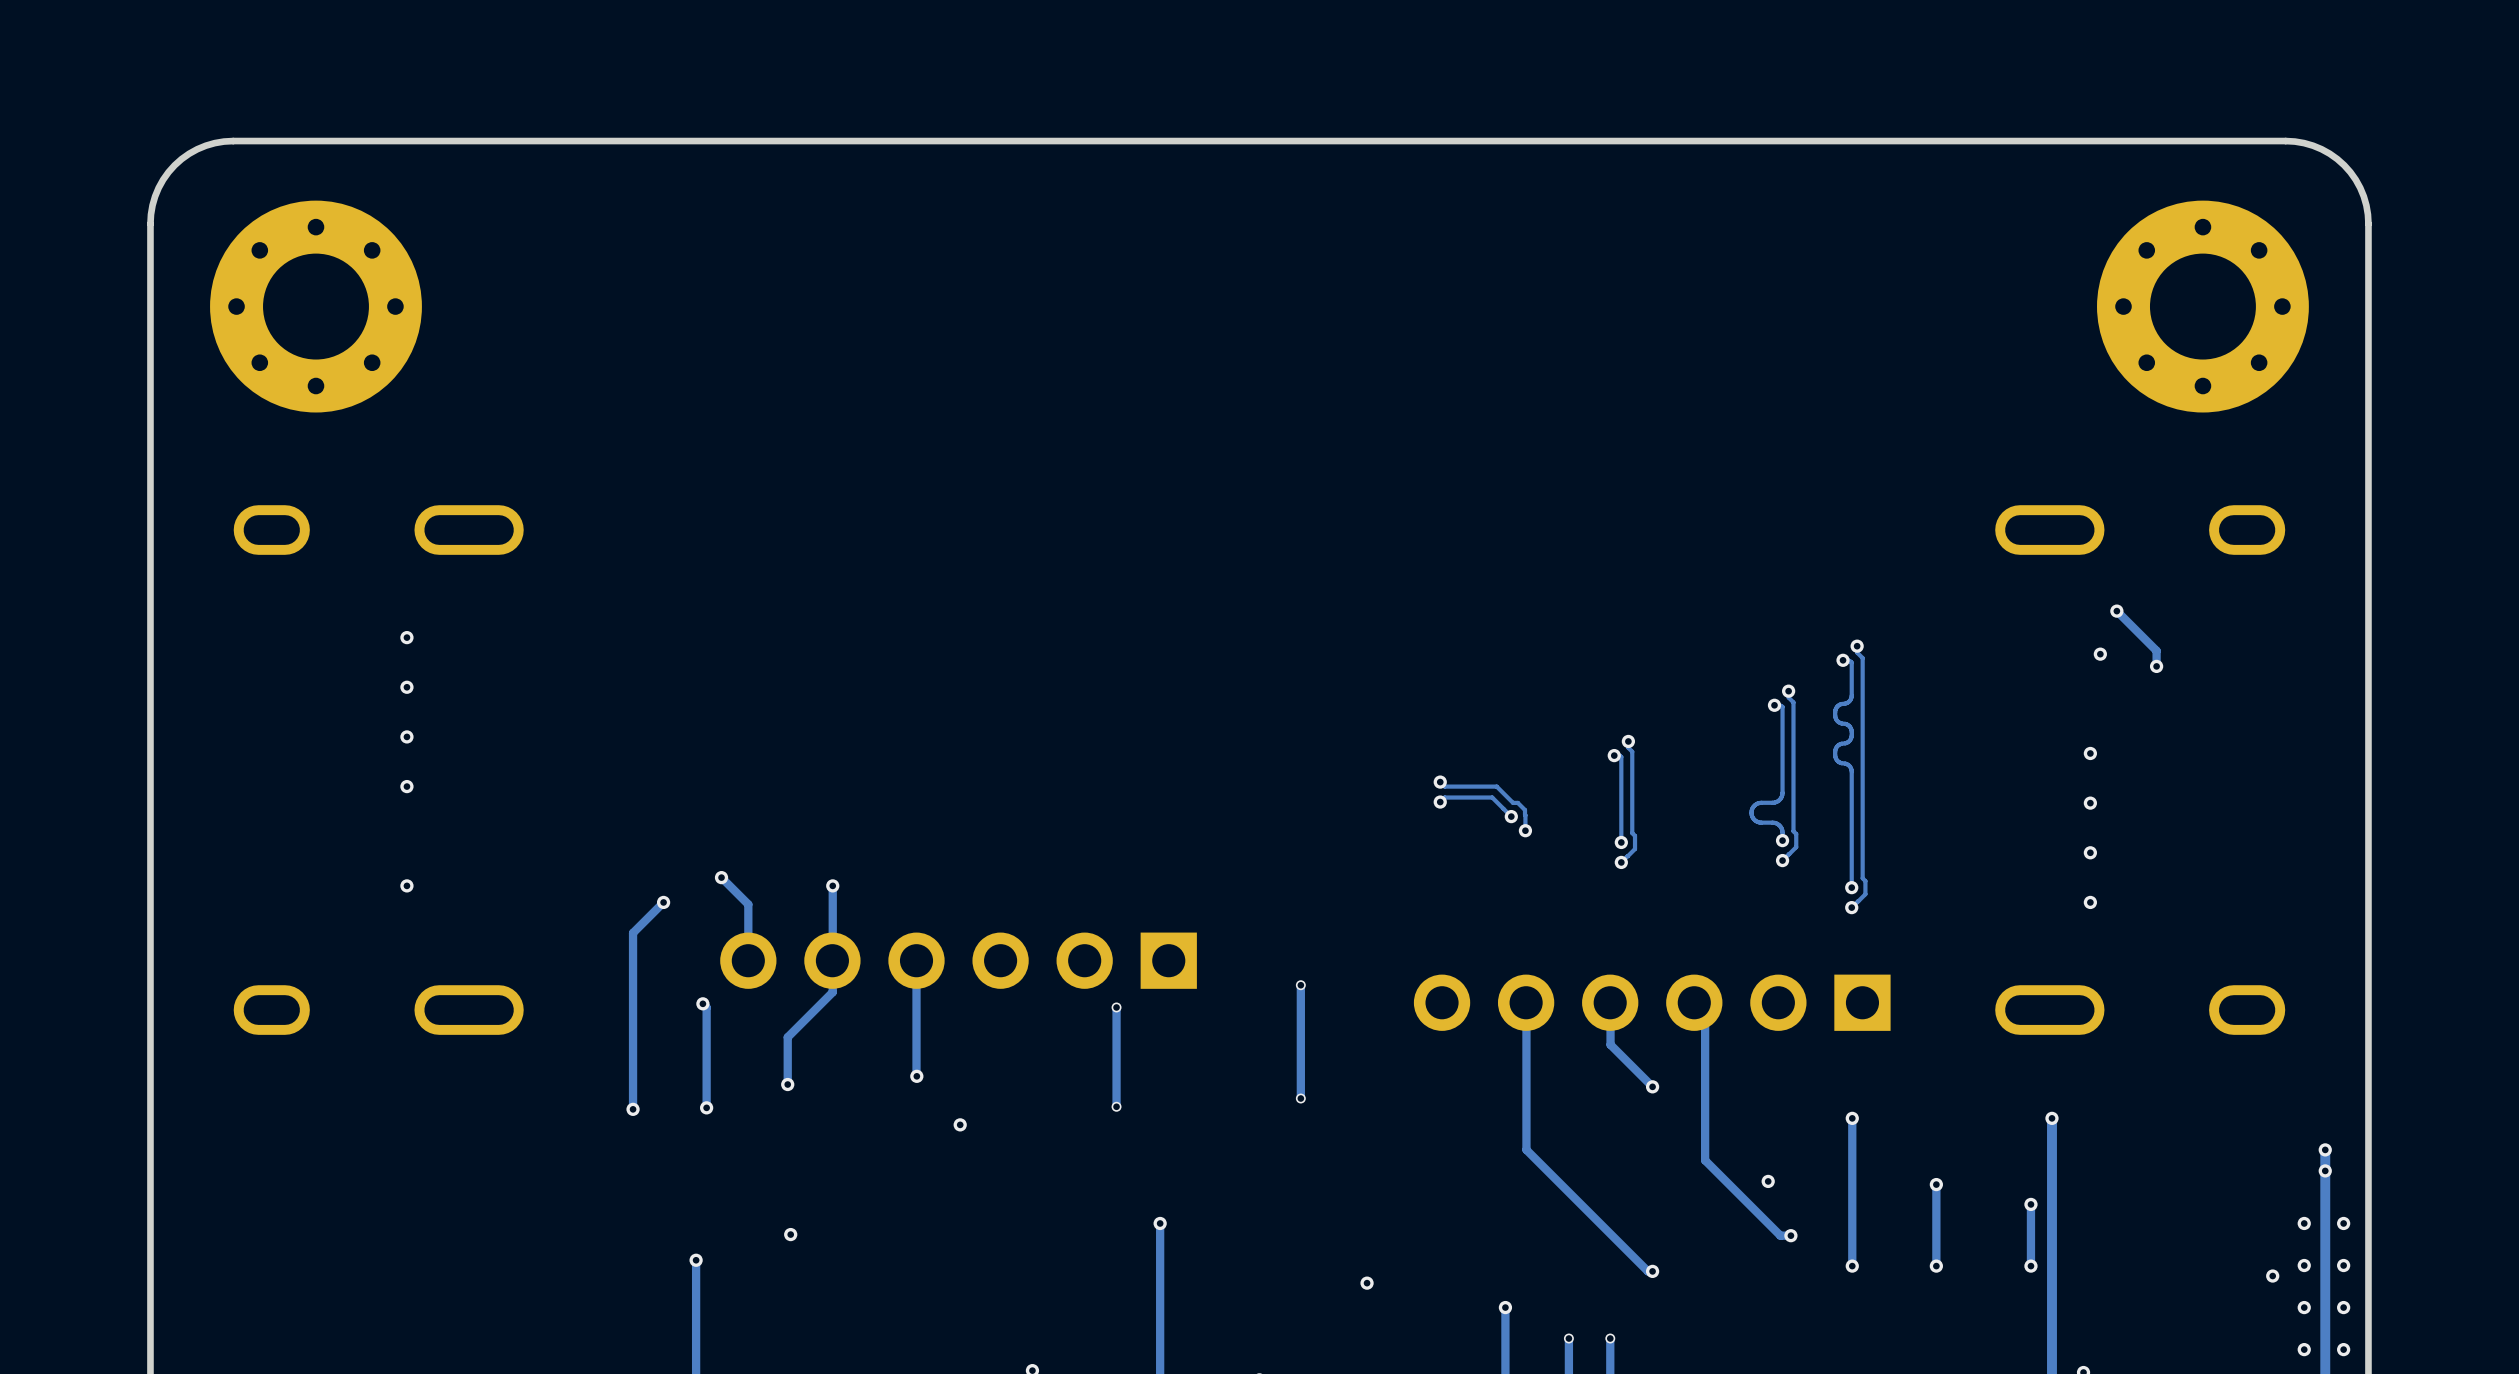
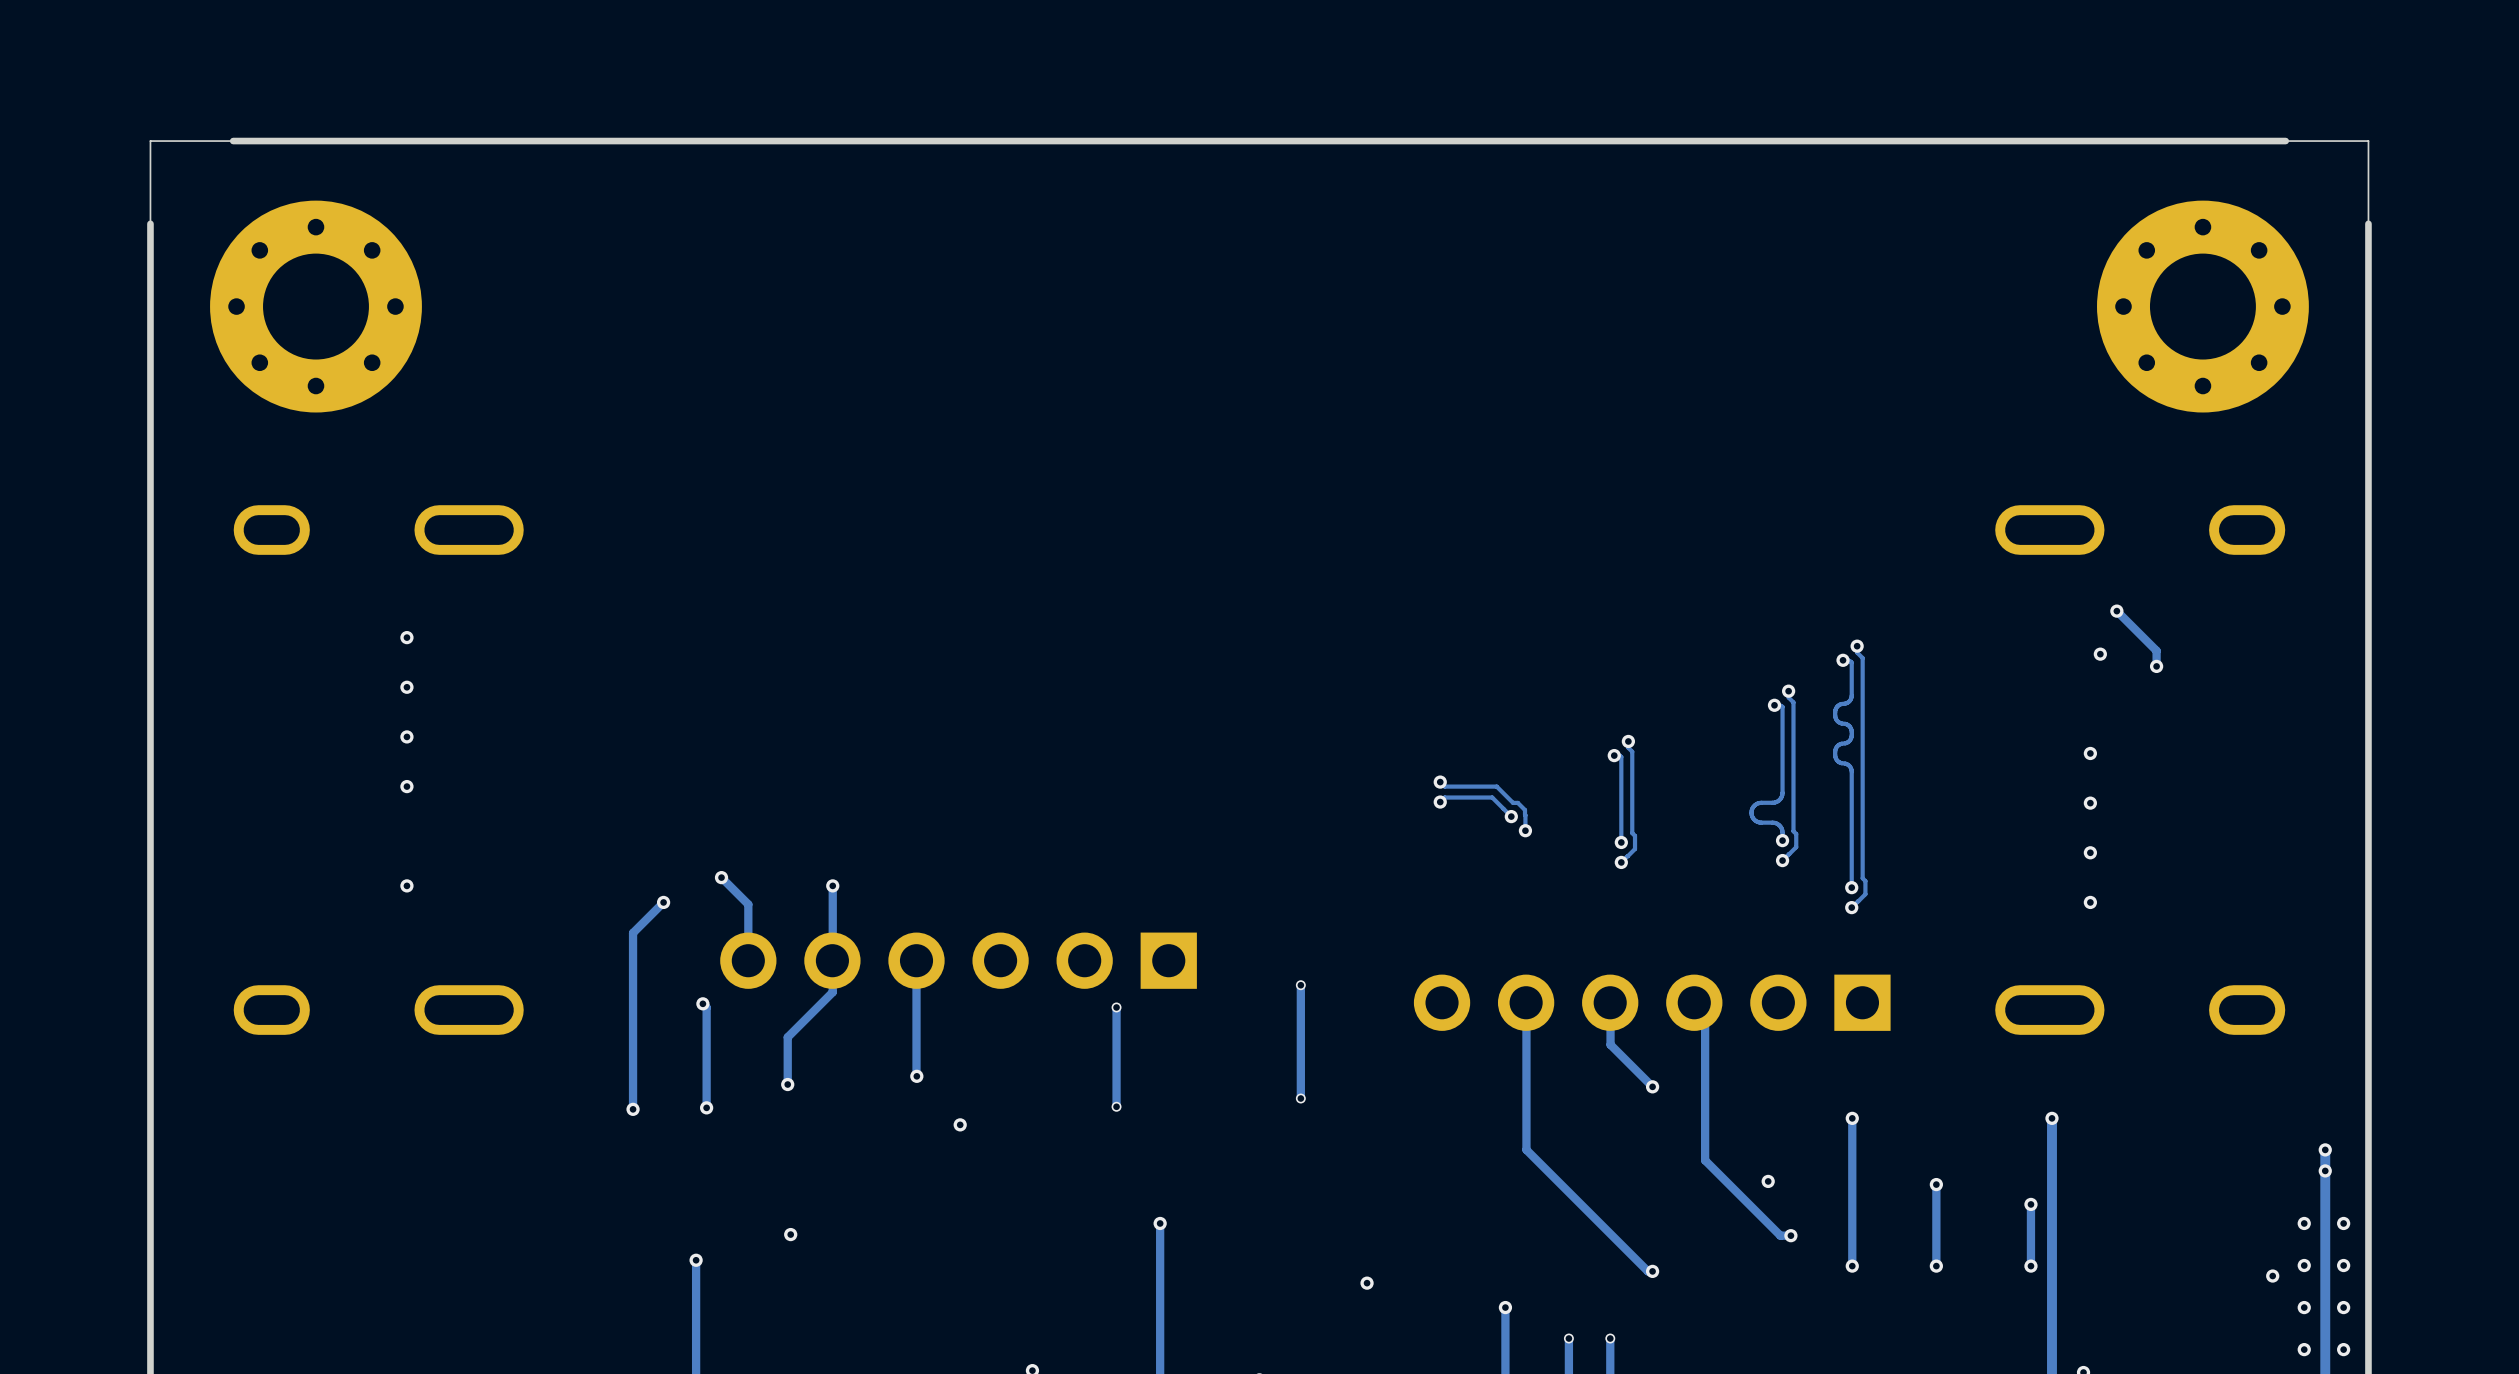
board edge: (233, 141) (205, 145) (189, 153) (174, 165) (158, 187) (152, 205) (150, 223) -> (233, 141) (150, 141) (150, 223)
board edge: (2285, 141) (2304, 143) (2321, 149) (2344, 165) (2355, 179) (2363, 196) (2368, 223) -> (2285, 141) (2368, 141) (2368, 223)

